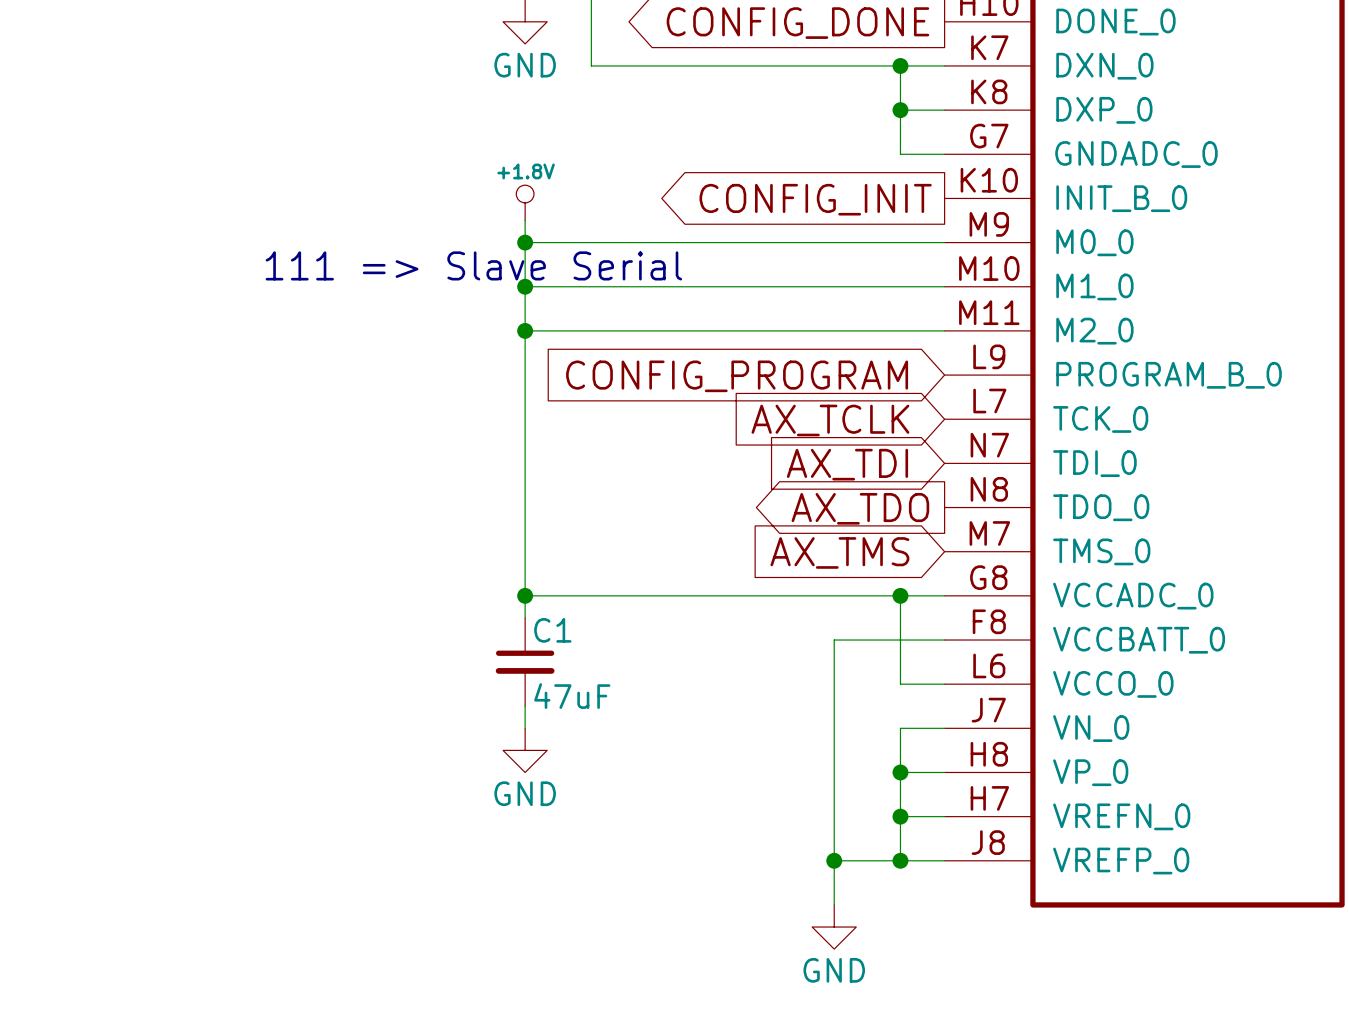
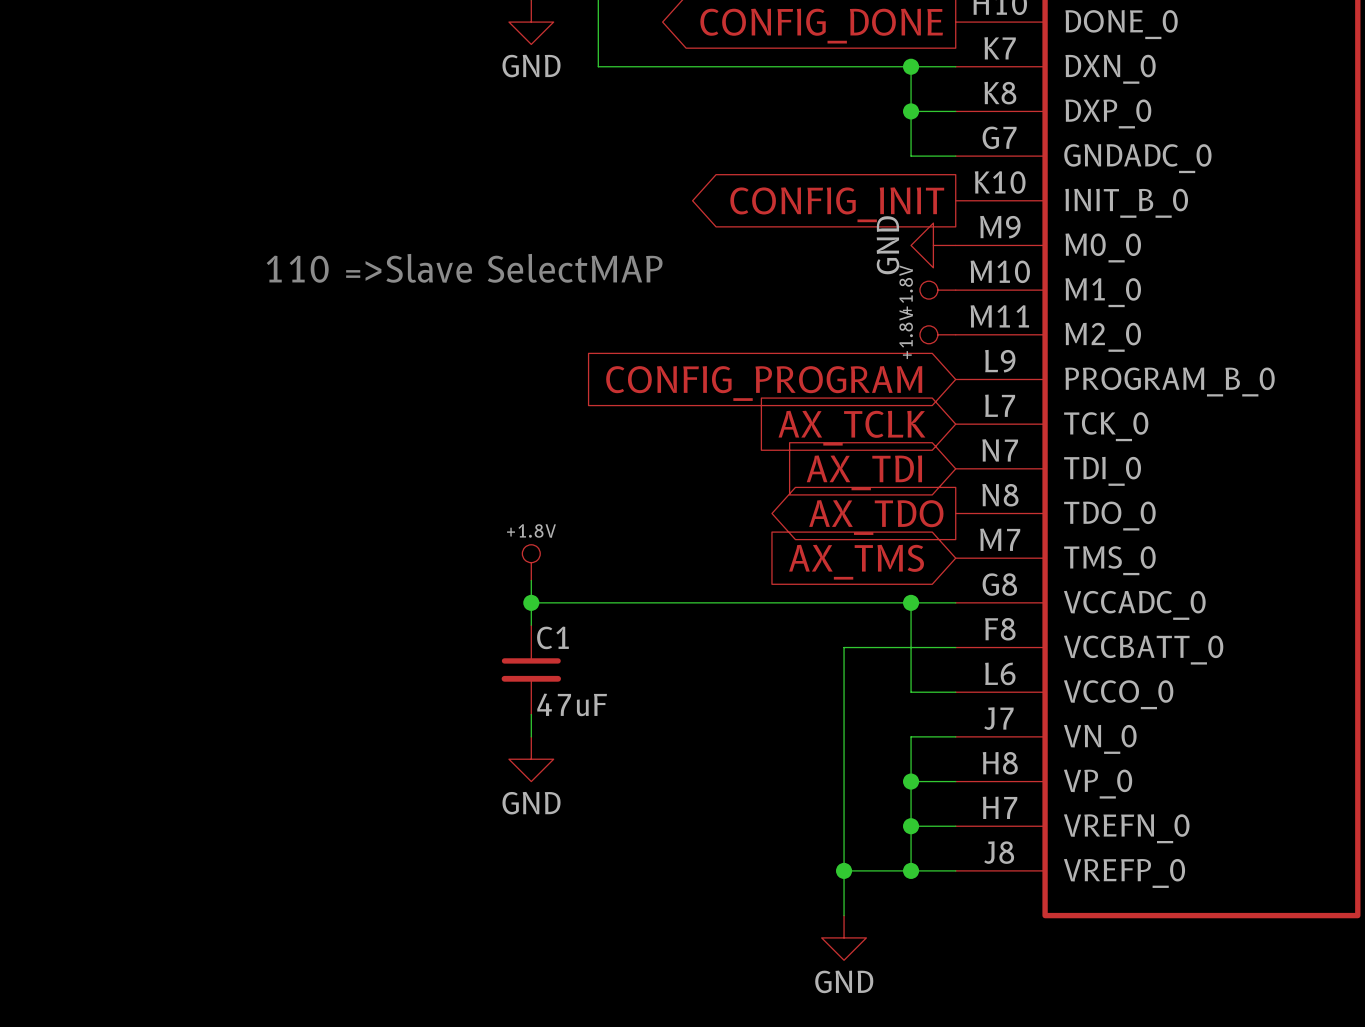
power symbol: +1.8V (525, 202) -> none
wire: (525, 220) (525, 573) -> none
wire: (525, 242) (944, 242) -> none
junction: (525, 242) -> none
power symbol: none -> GND (933, 245)
text: 111 => Slave Serial (473, 265) -> 110 =>Slave SelectMAP (464, 268)
wire: (525, 286) (944, 286) -> none
junction: (525, 286) -> none
power symbol: none -> +1.8V (937, 290)
wire: (525, 330) (944, 330) -> none
junction: (525, 330) -> none
power symbol: none -> +1.8V (937, 334)
power symbol: none -> +1.8V (531, 562)

